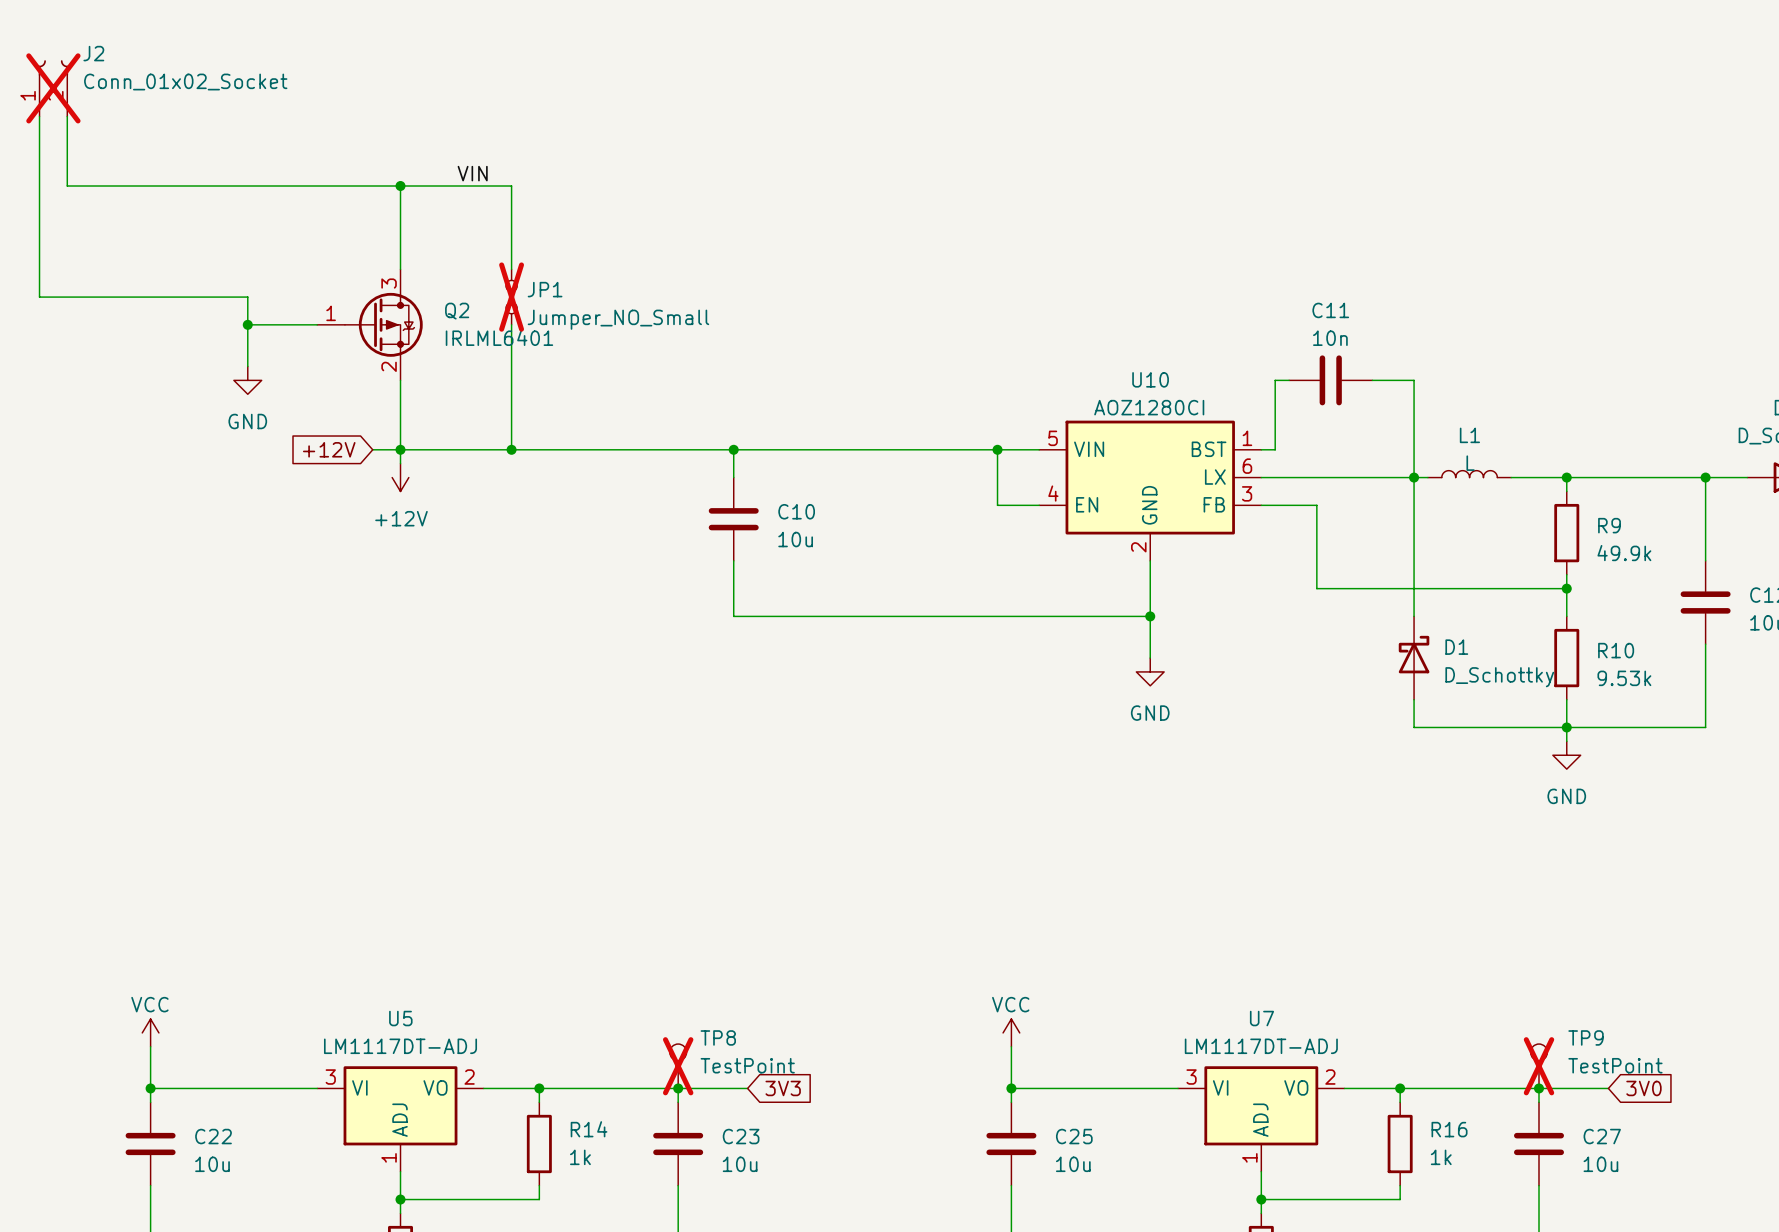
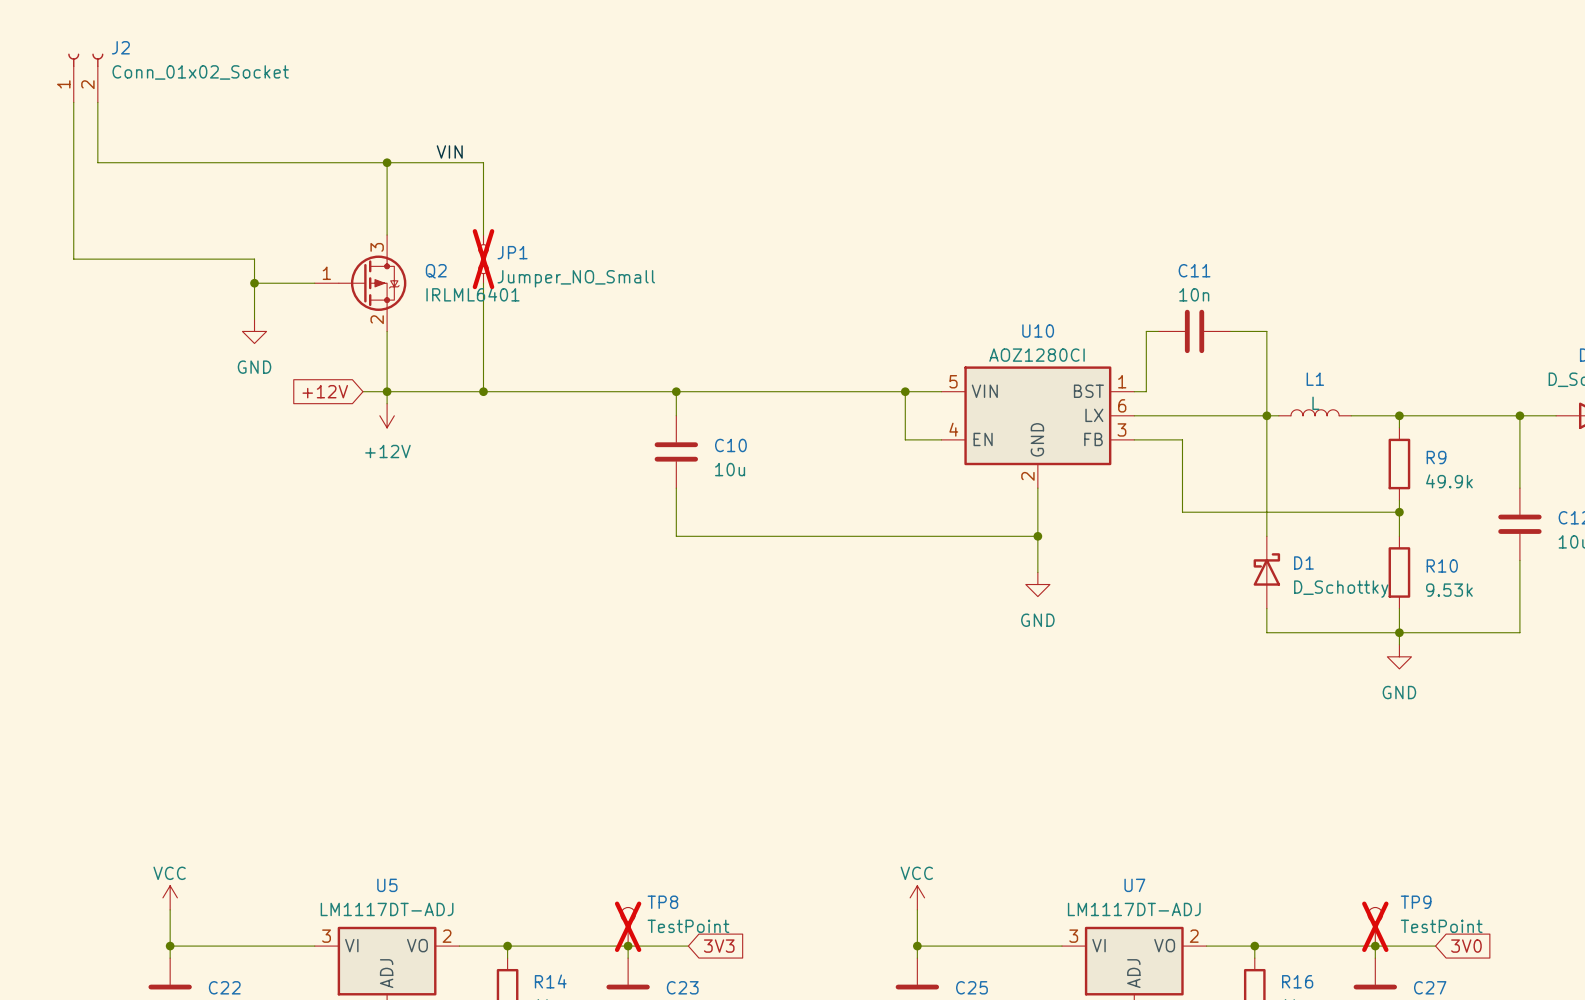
J2 do-not-place cross: (53, 88) -> none

